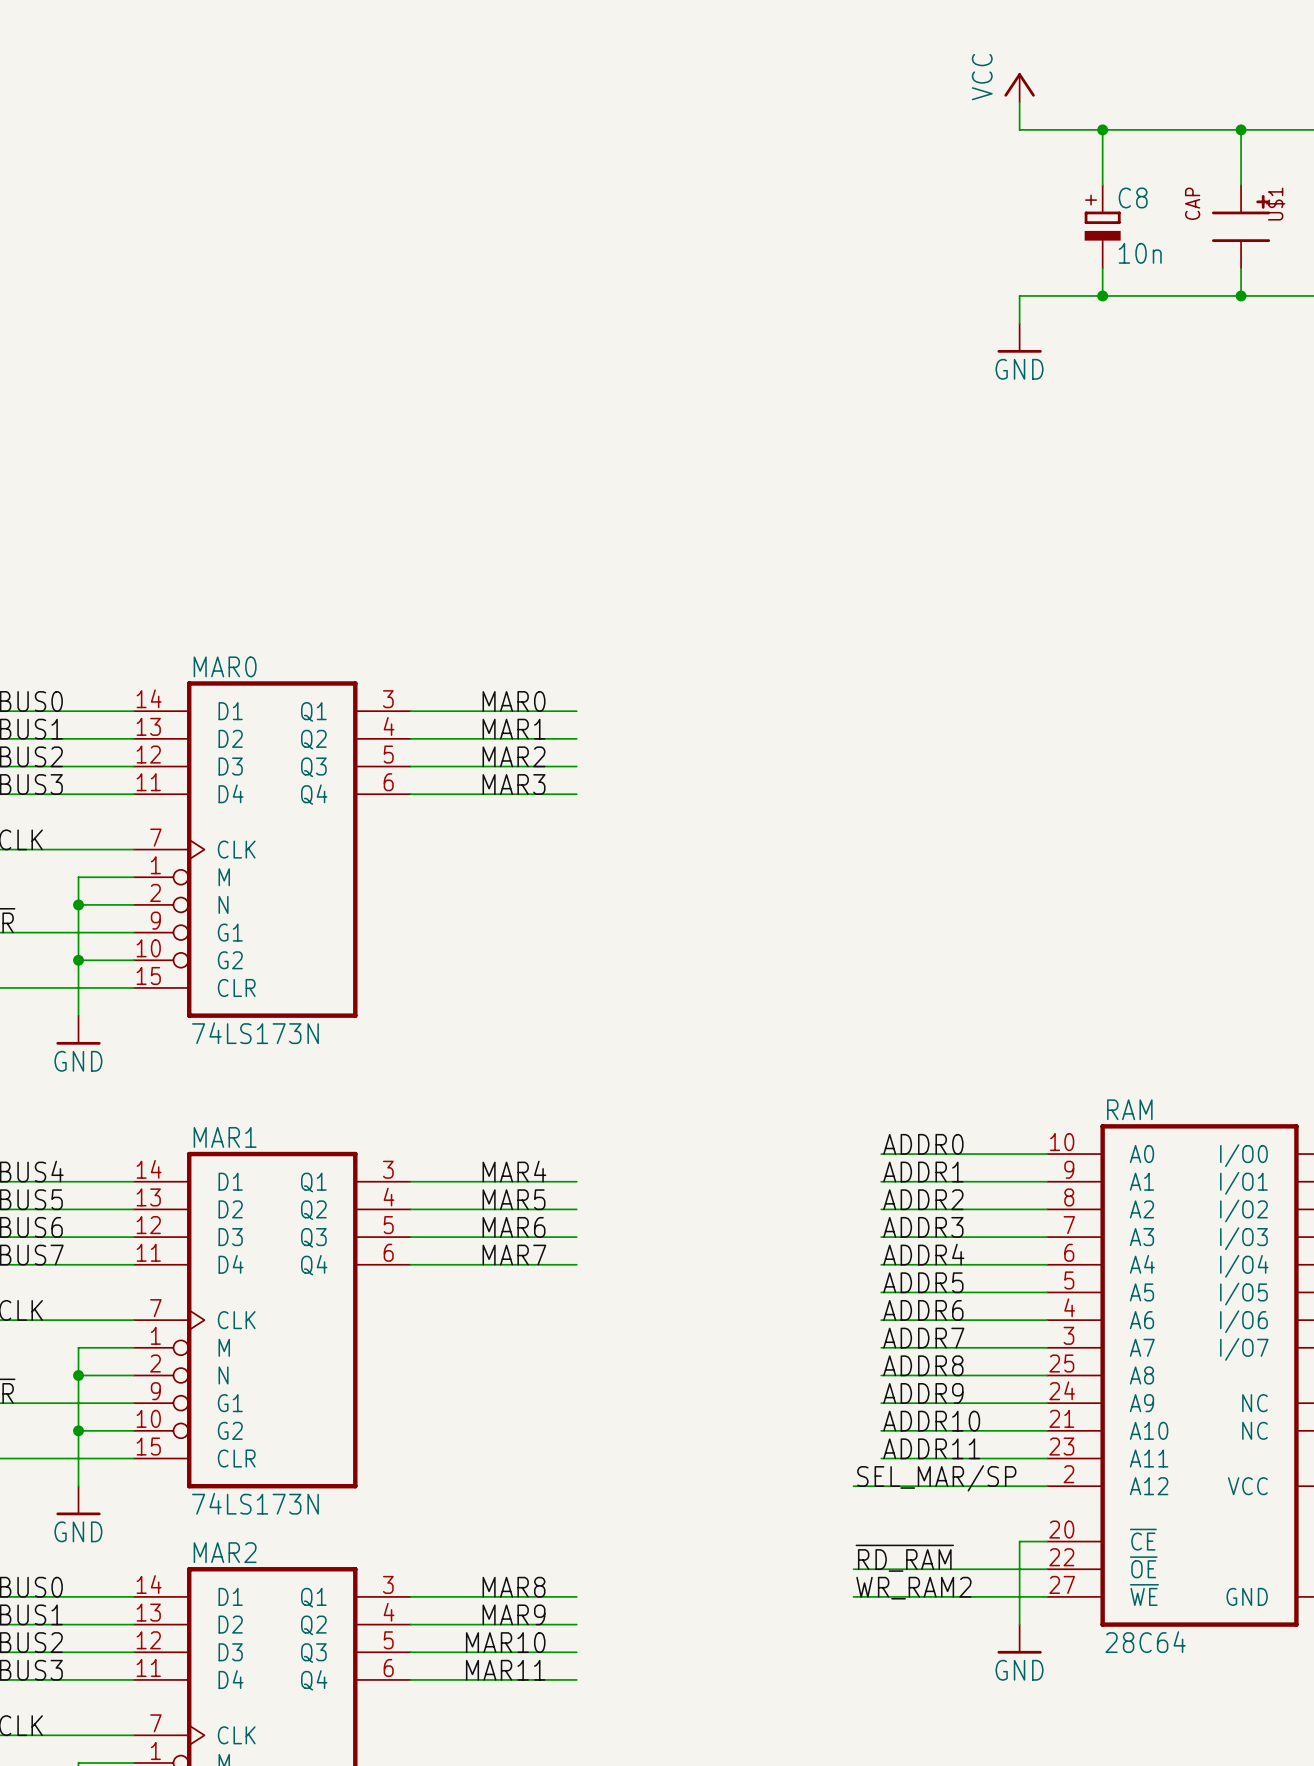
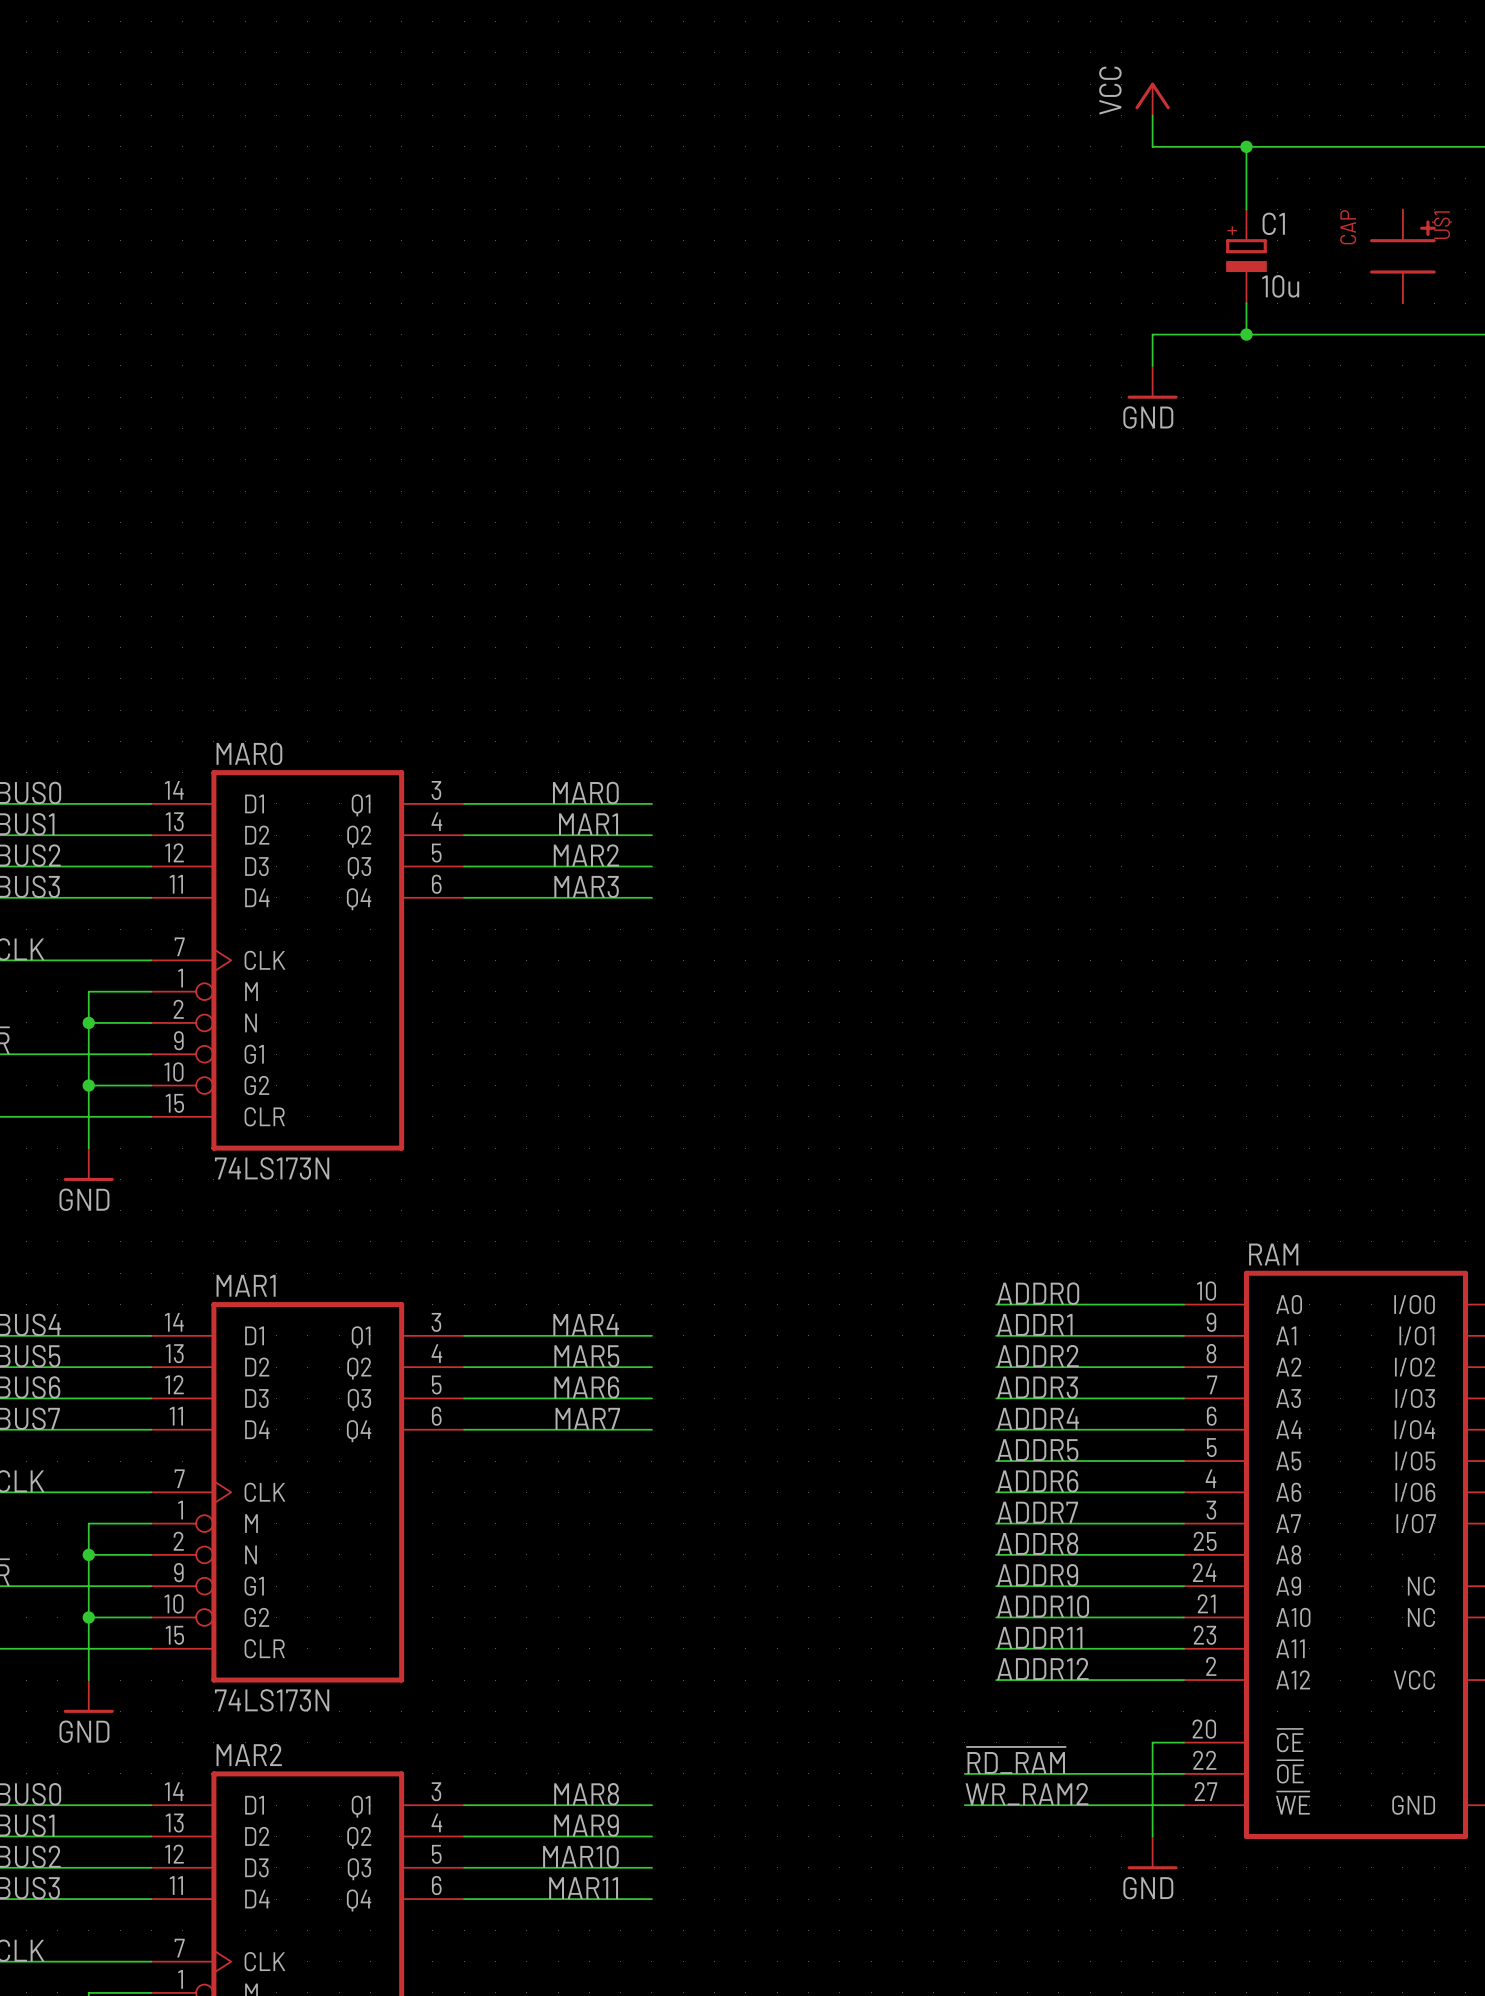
wire: (1241, 129) (1241, 185) -> none
junction: (1241, 129) -> none
C8 name: C8 (1133, 197) -> C1 (1273, 223)
C8 value: 10n (1140, 253) -> 10u (1280, 286)
wire: (1241, 268) (1241, 295) -> none
junction: (1241, 295) -> none
label: none -> ADDR12 (1042, 1668)
label: SEL_MAR/SP (936, 1478) -> none
wire: (853, 1486) (881, 1486) -> none
RAM value: 28C64 (1145, 1642) -> none

